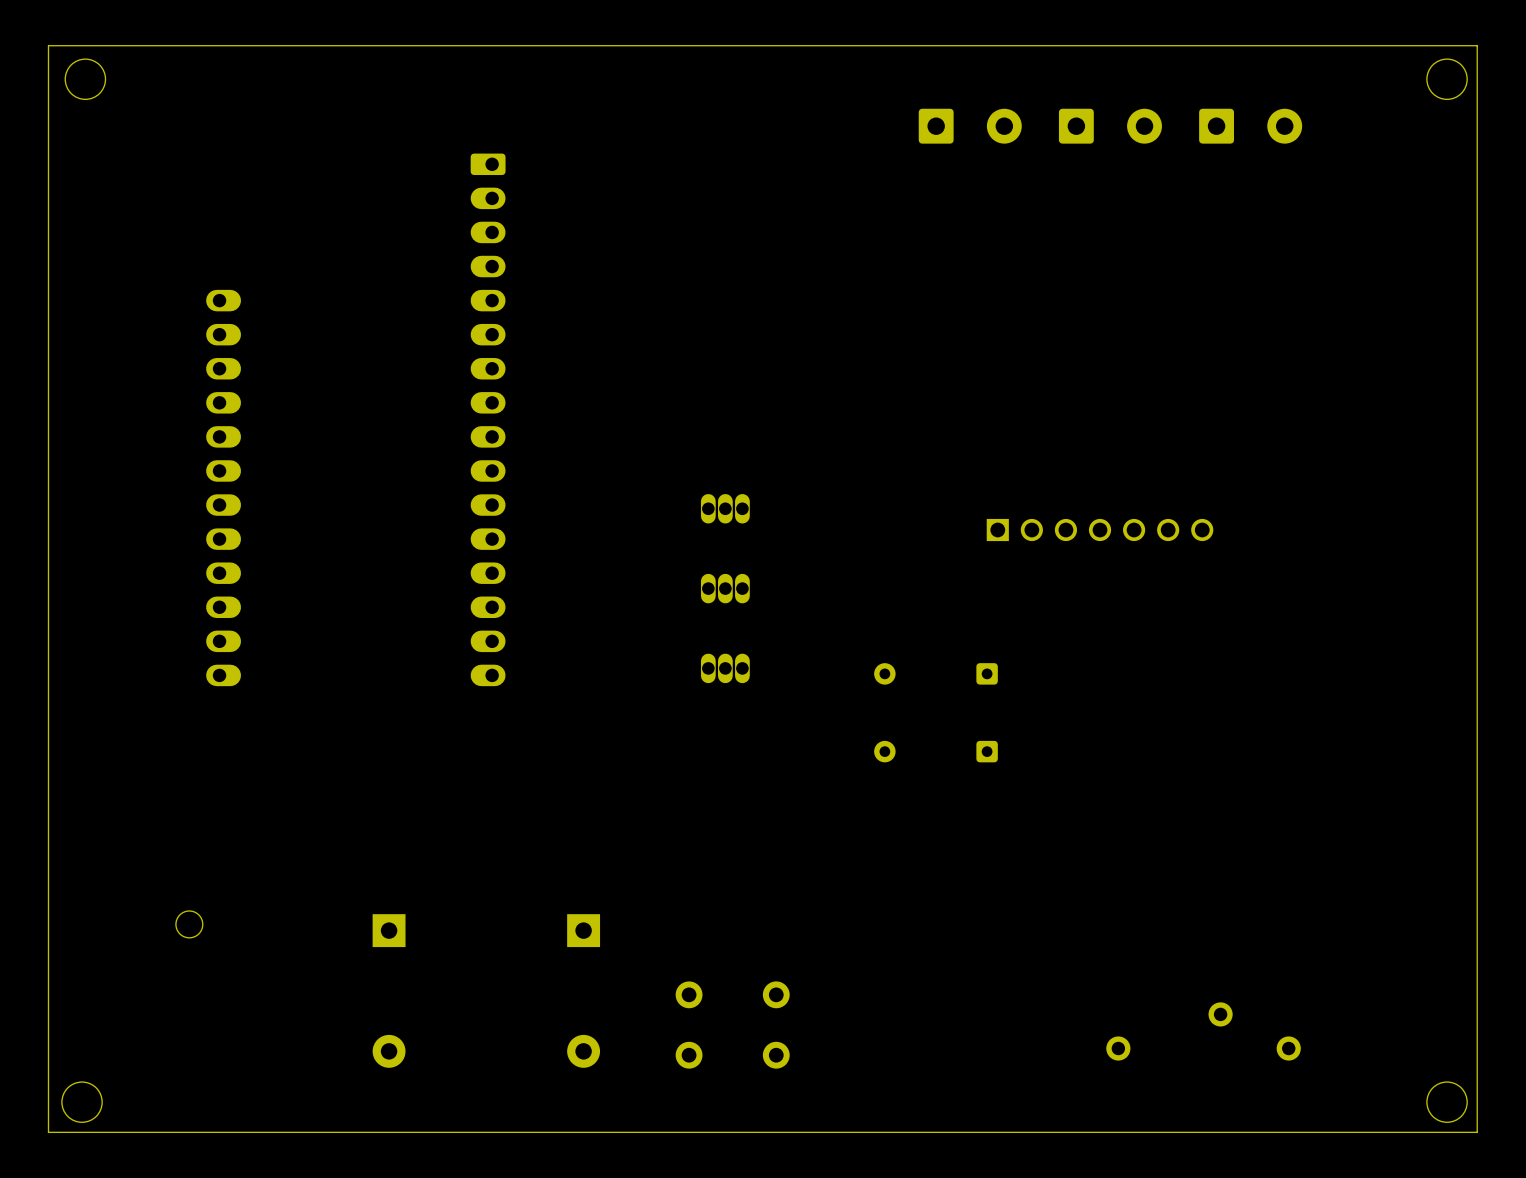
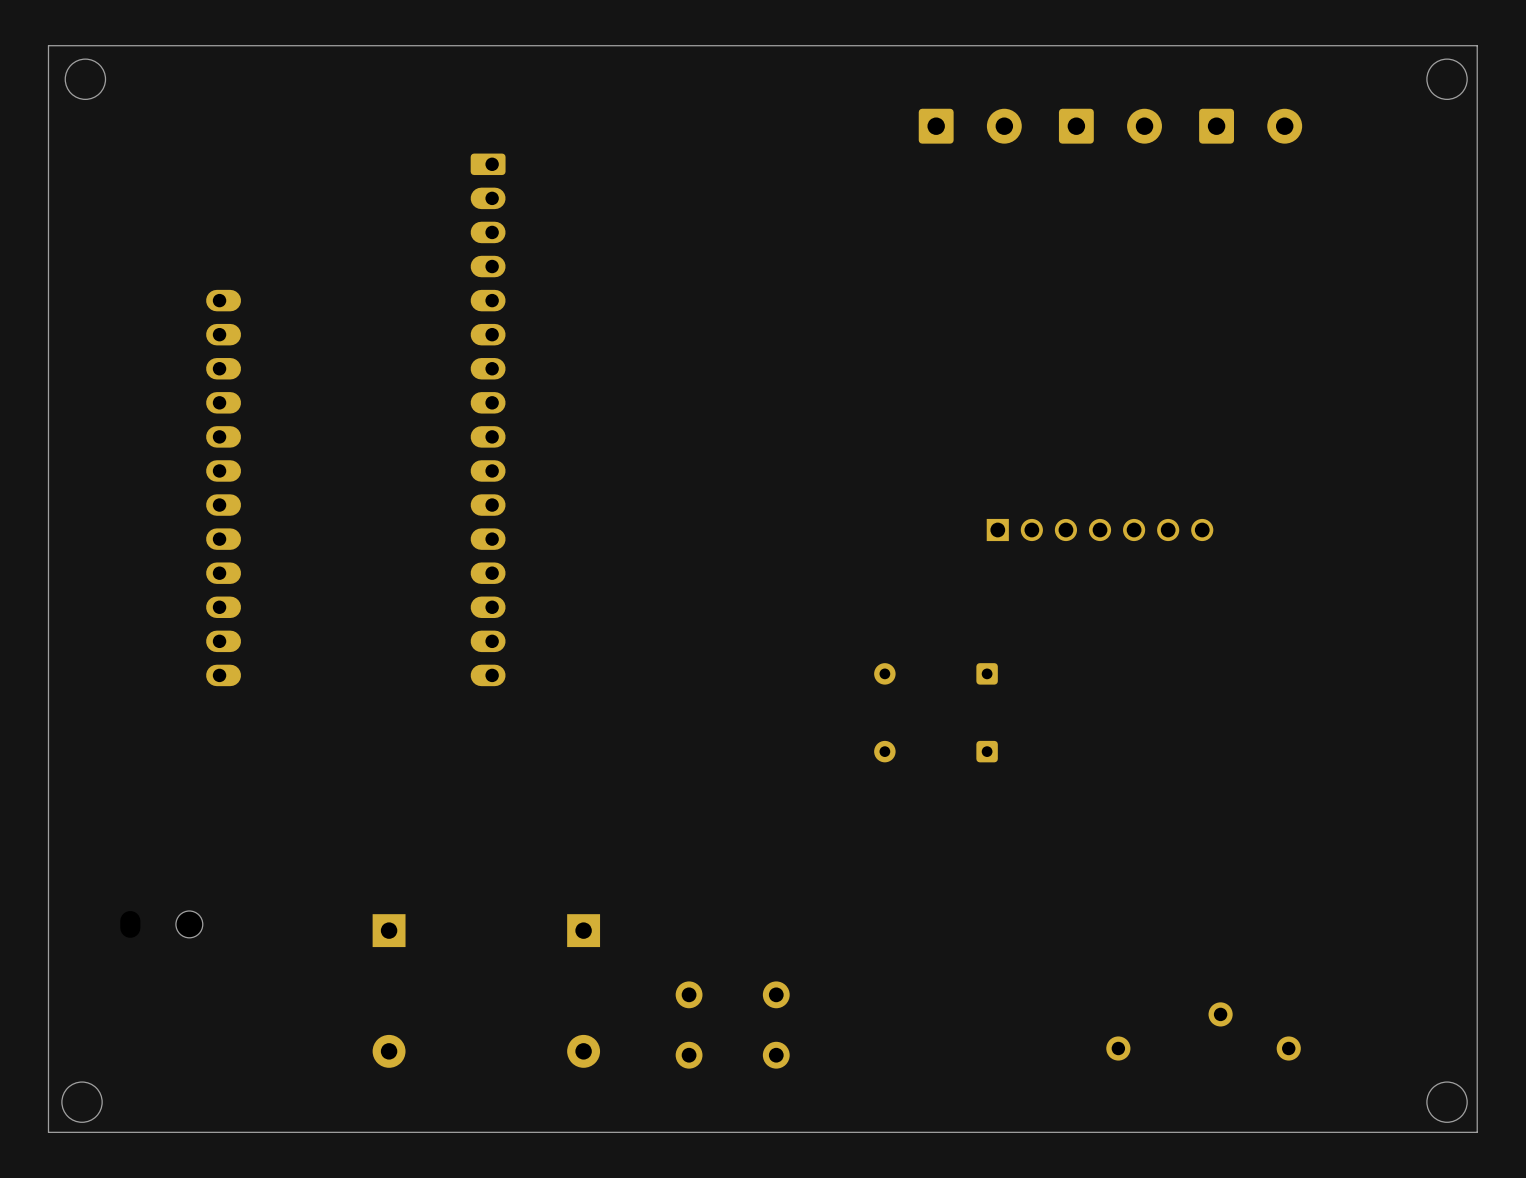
part: (725, 508) -> none
part: (725, 588) -> none
part: (725, 668) -> none

